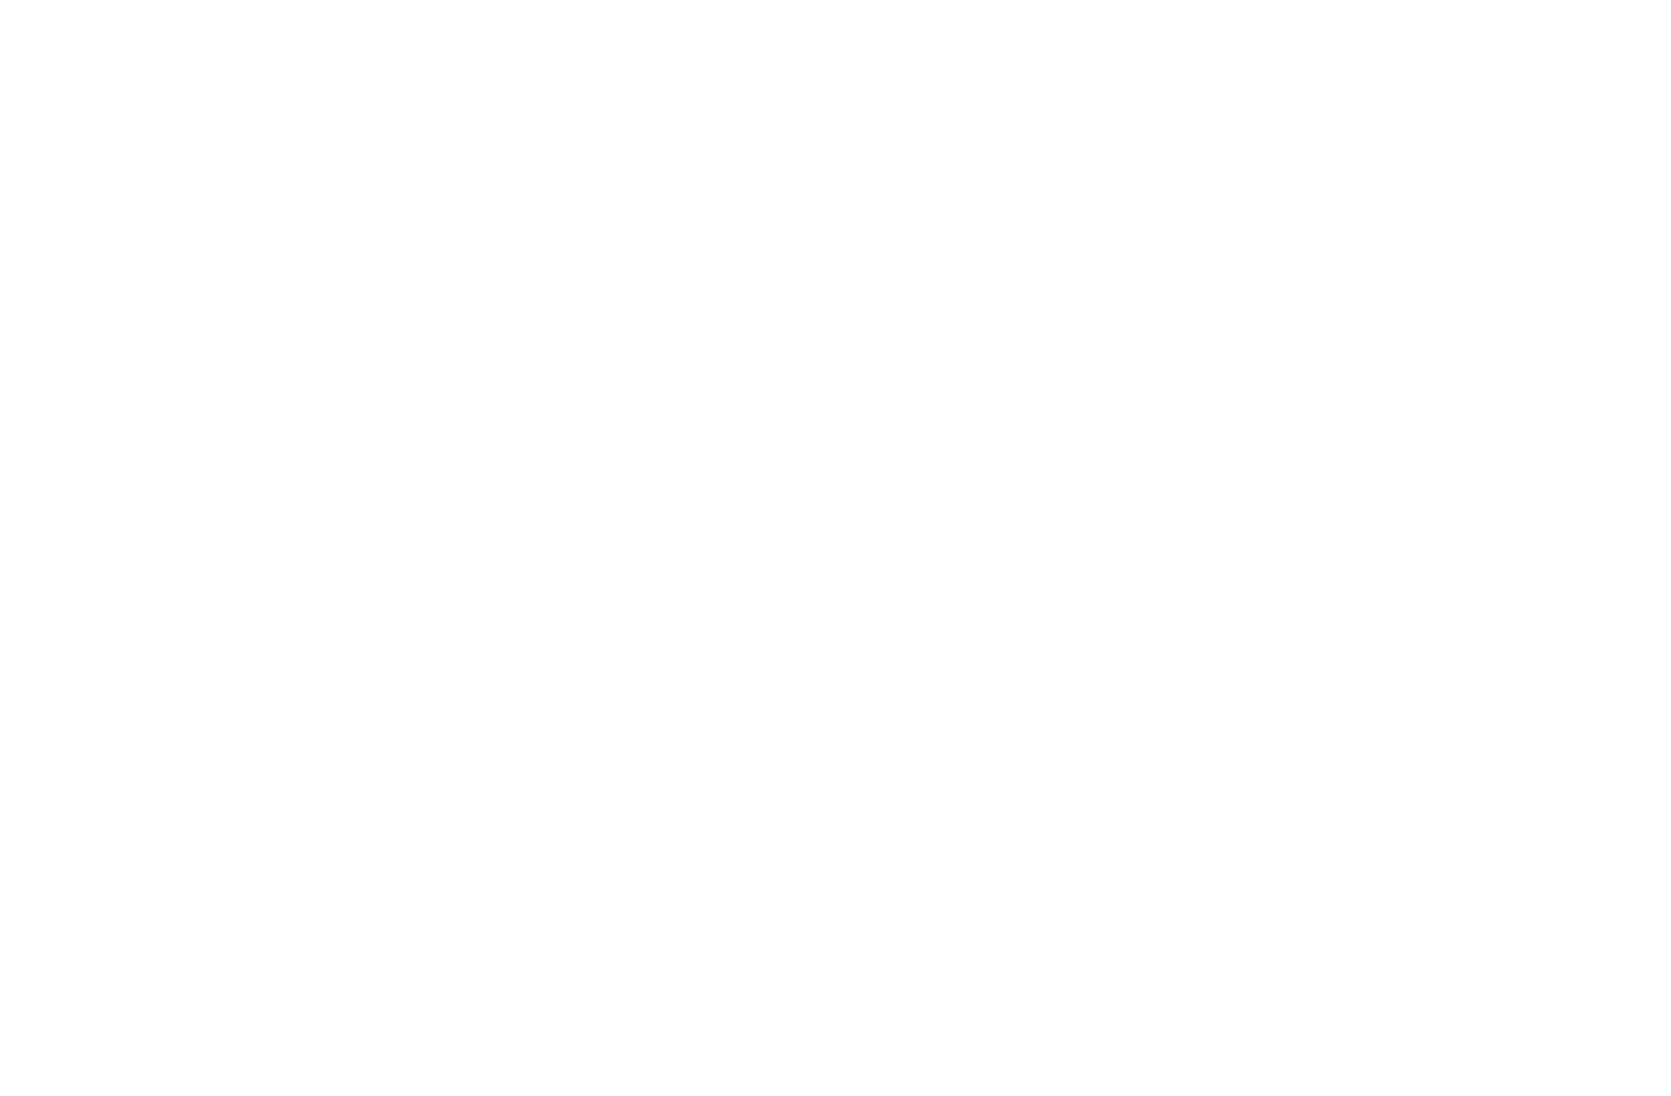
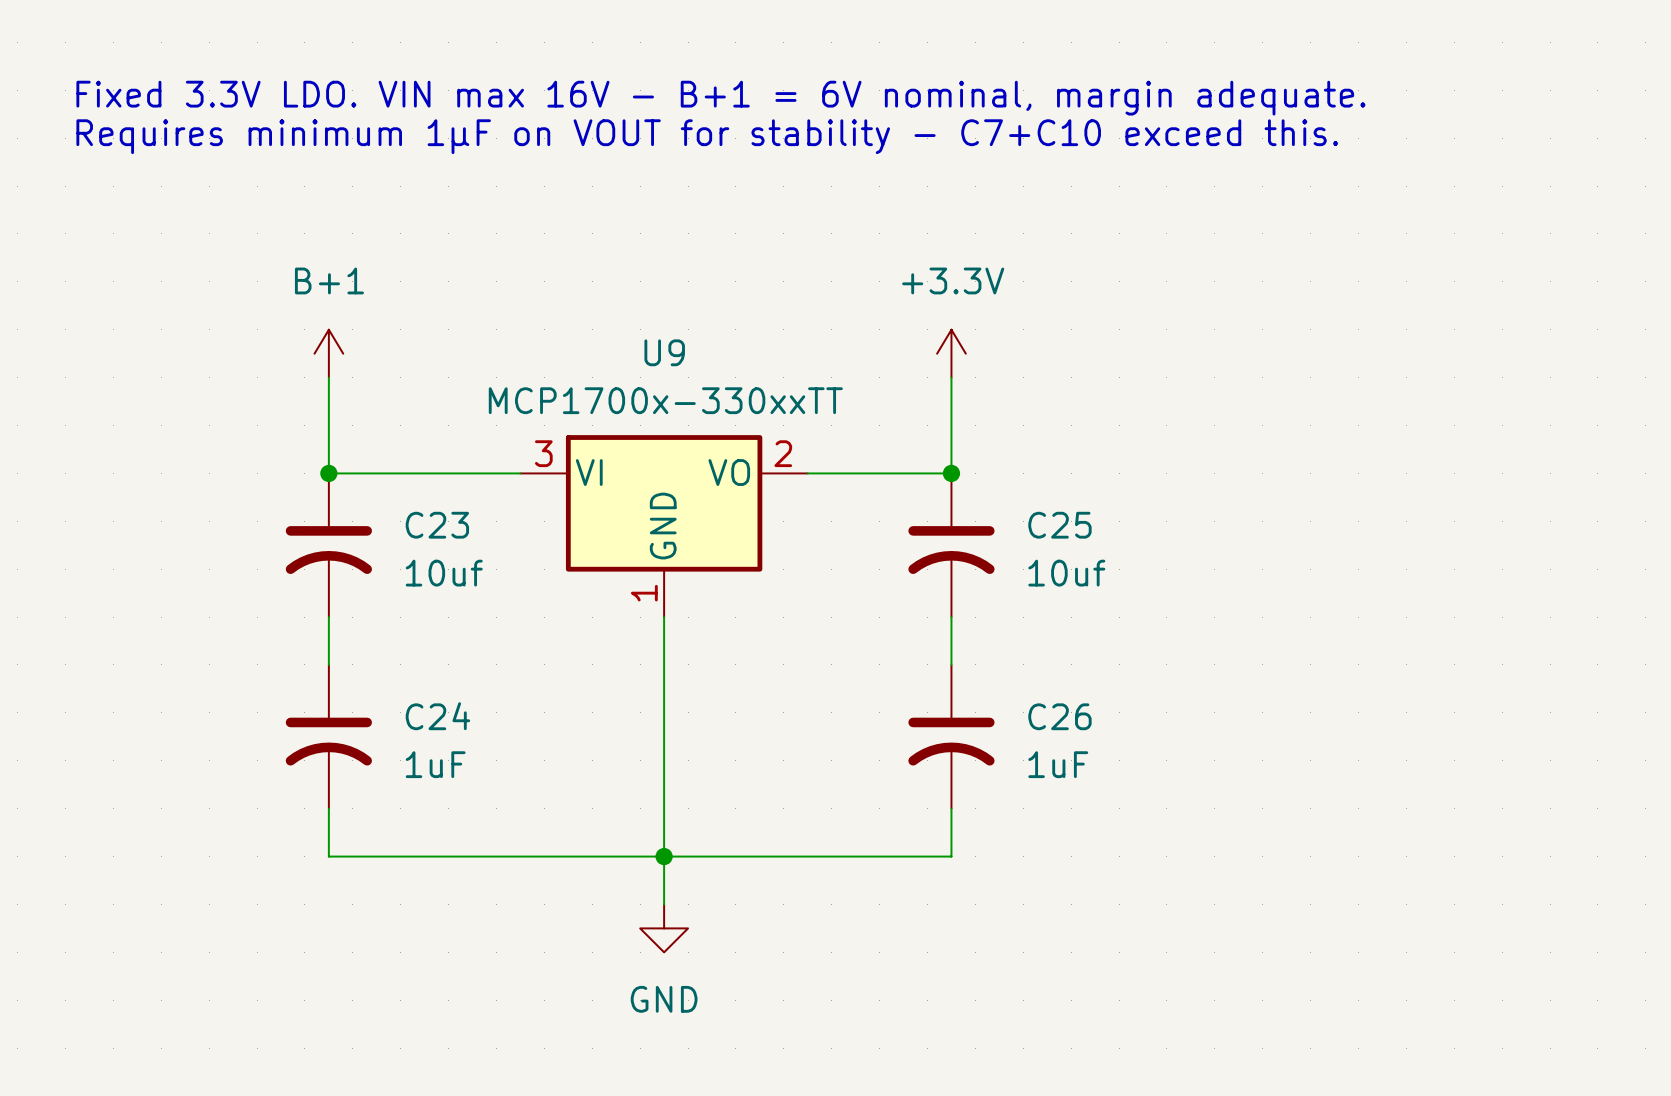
text: none -> Fixed 3.3V LDO. VIN max 16V - B+1 = 6V nominal, margin adequate. (720, 98)
text: none -> Requires minimum 1µF on VOUT for stability - C7+C10 exceed this. (707, 136)
power symbol: none -> B+1 (328, 353)
power symbol: none -> +3.3V (951, 353)
wire: none -> (328, 377) (328, 473) (520, 473)
wire: none -> (951, 377) (951, 473) (807, 473)
junction: none -> (328, 473)
junction: none -> (951, 473)
U9: none -> MCP1700x-330xxTT (664, 526)
C23: none -> 10uf (328, 545)
C25: none -> 10uf (951, 545)
wire: none -> (328, 617) (328, 664)
wire: none -> (664, 617) (664, 904)
wire: none -> (951, 617) (951, 664)
C24: none -> 1uF (328, 736)
C26: none -> 1uF (951, 736)
wire: none -> (328, 808) (328, 856) (951, 856) (951, 808)
junction: none -> (664, 856)
power symbol: none -> GND (664, 928)

